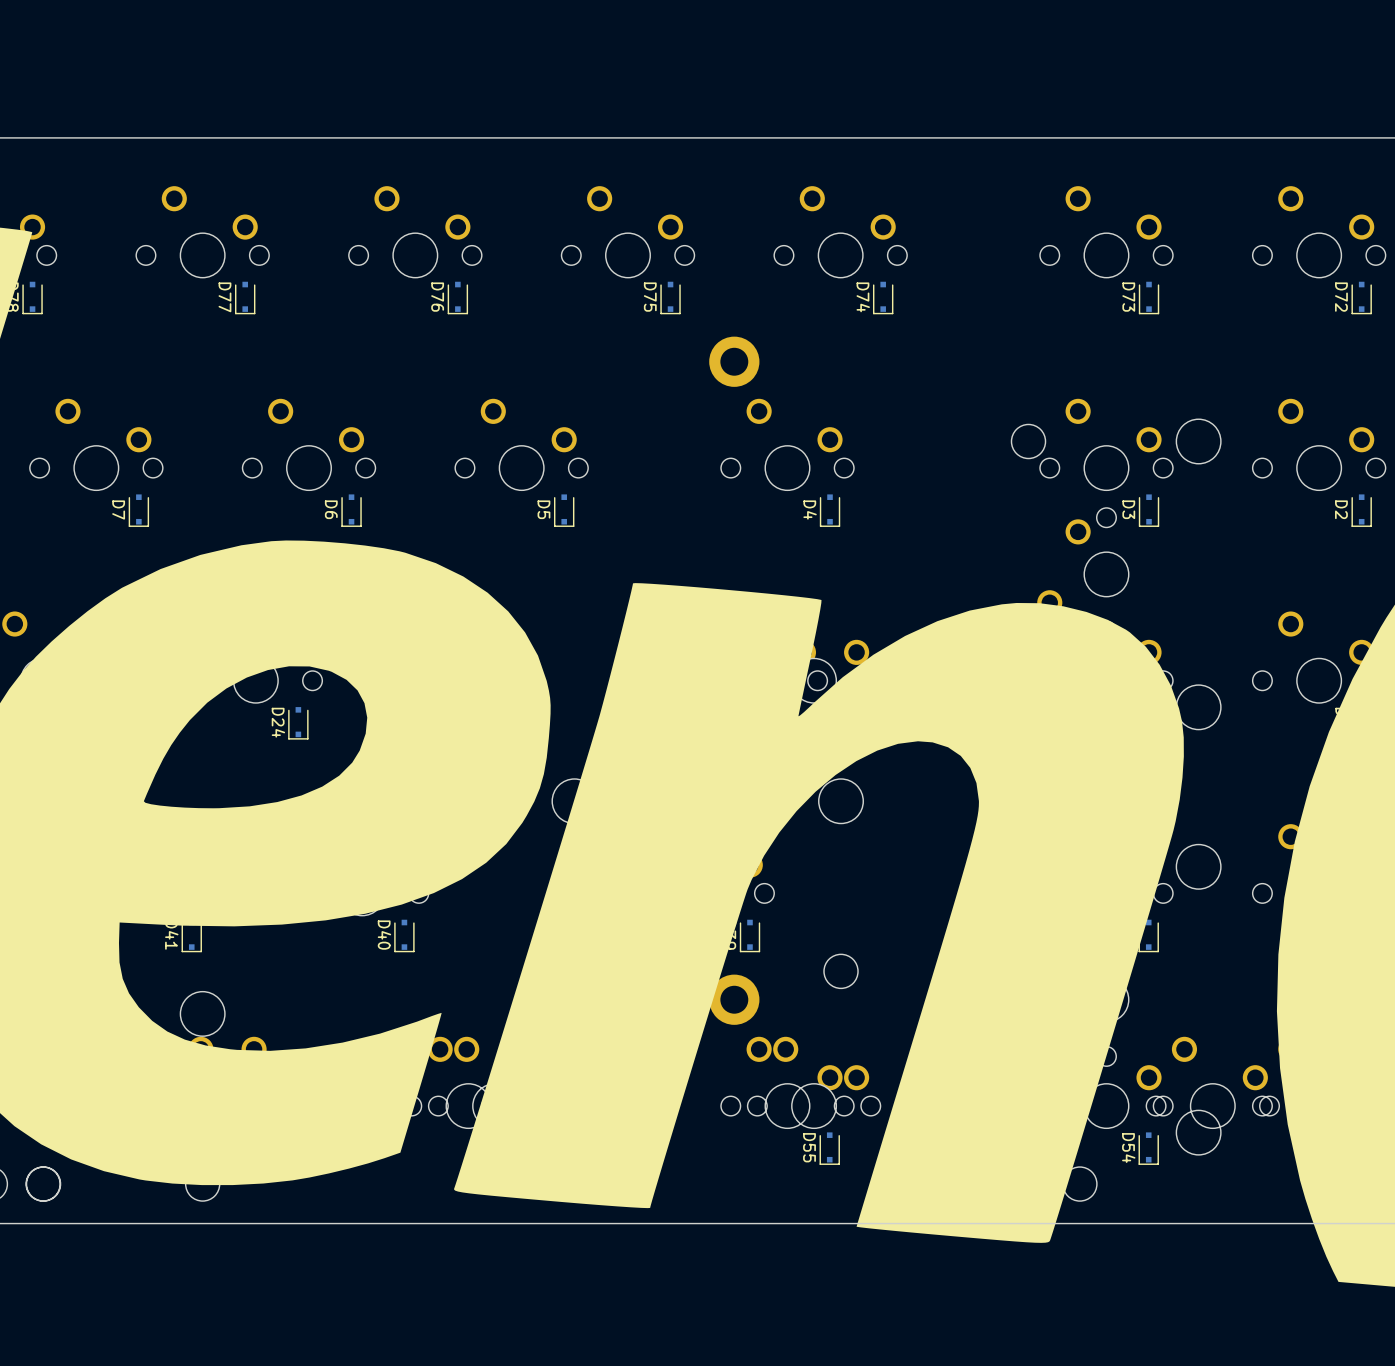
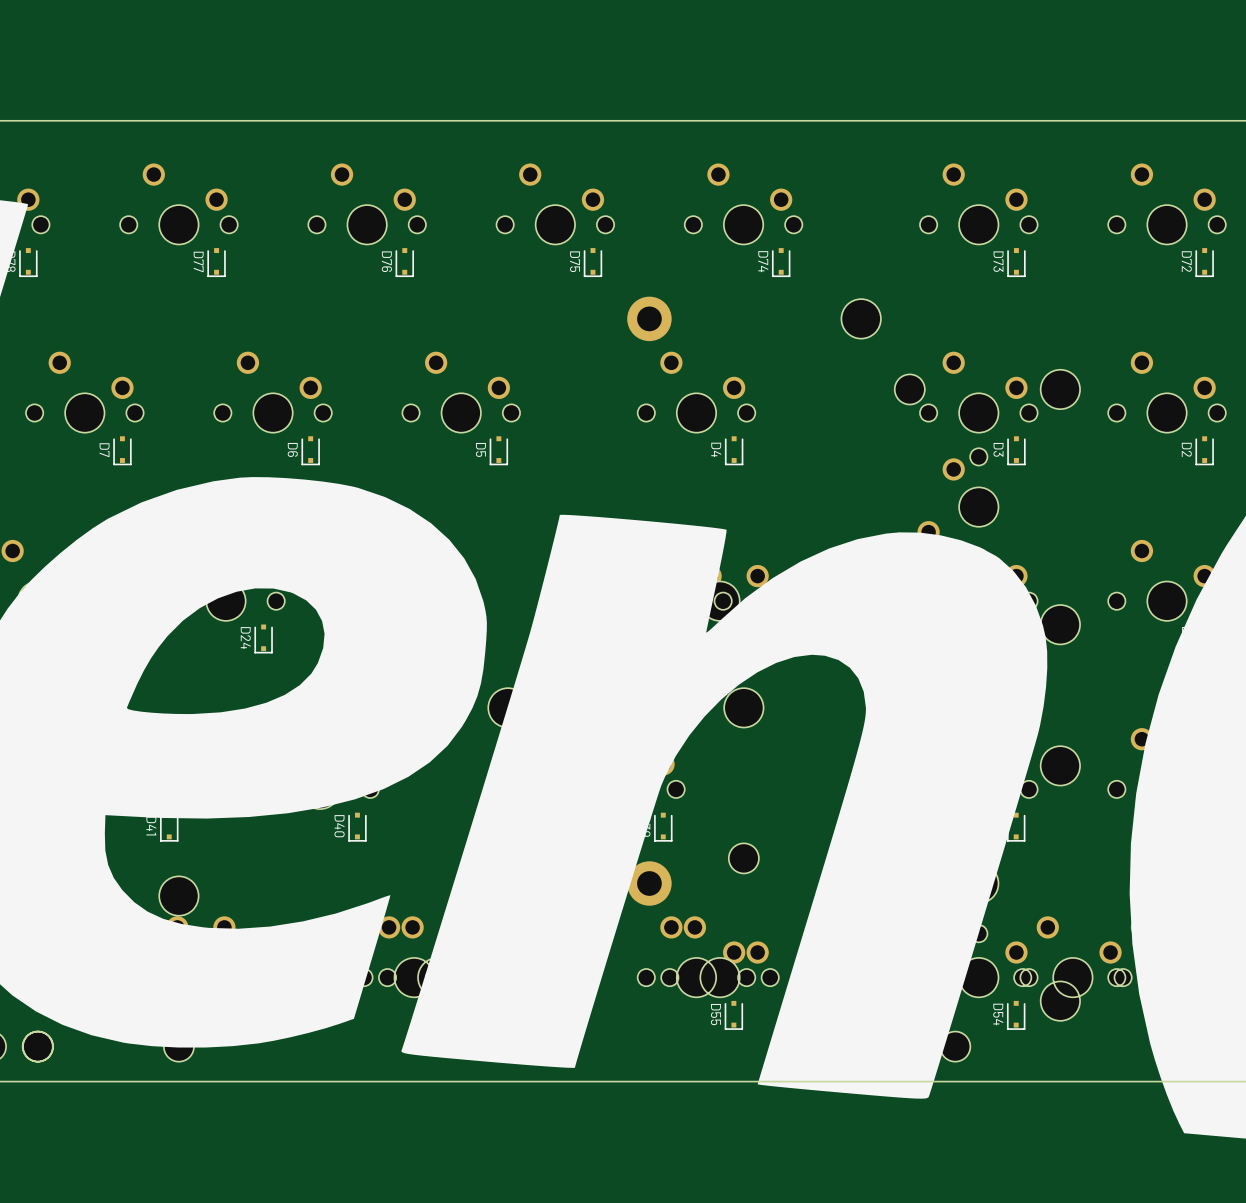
part: none -> (861, 318)

